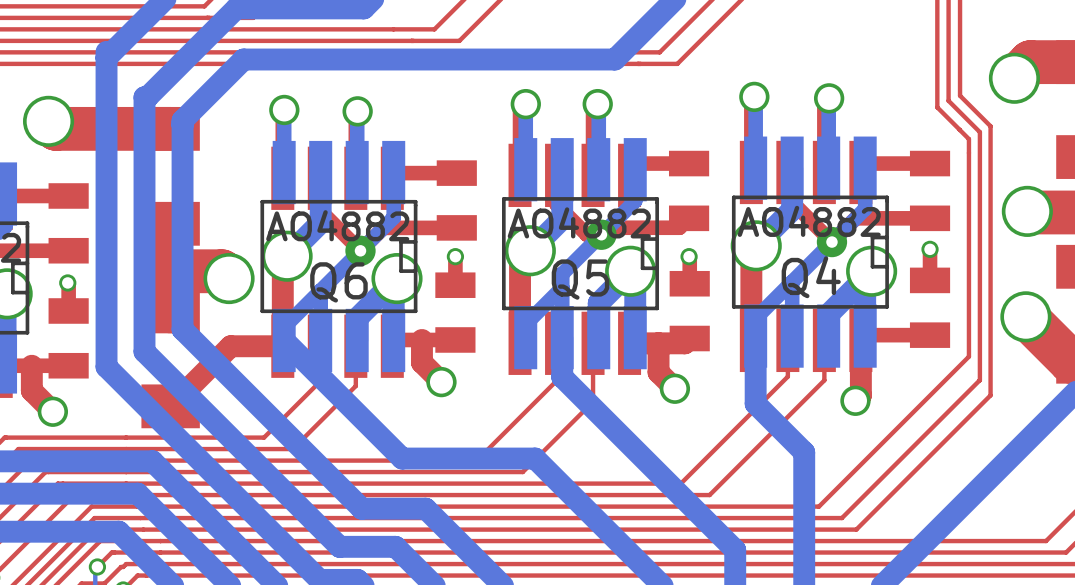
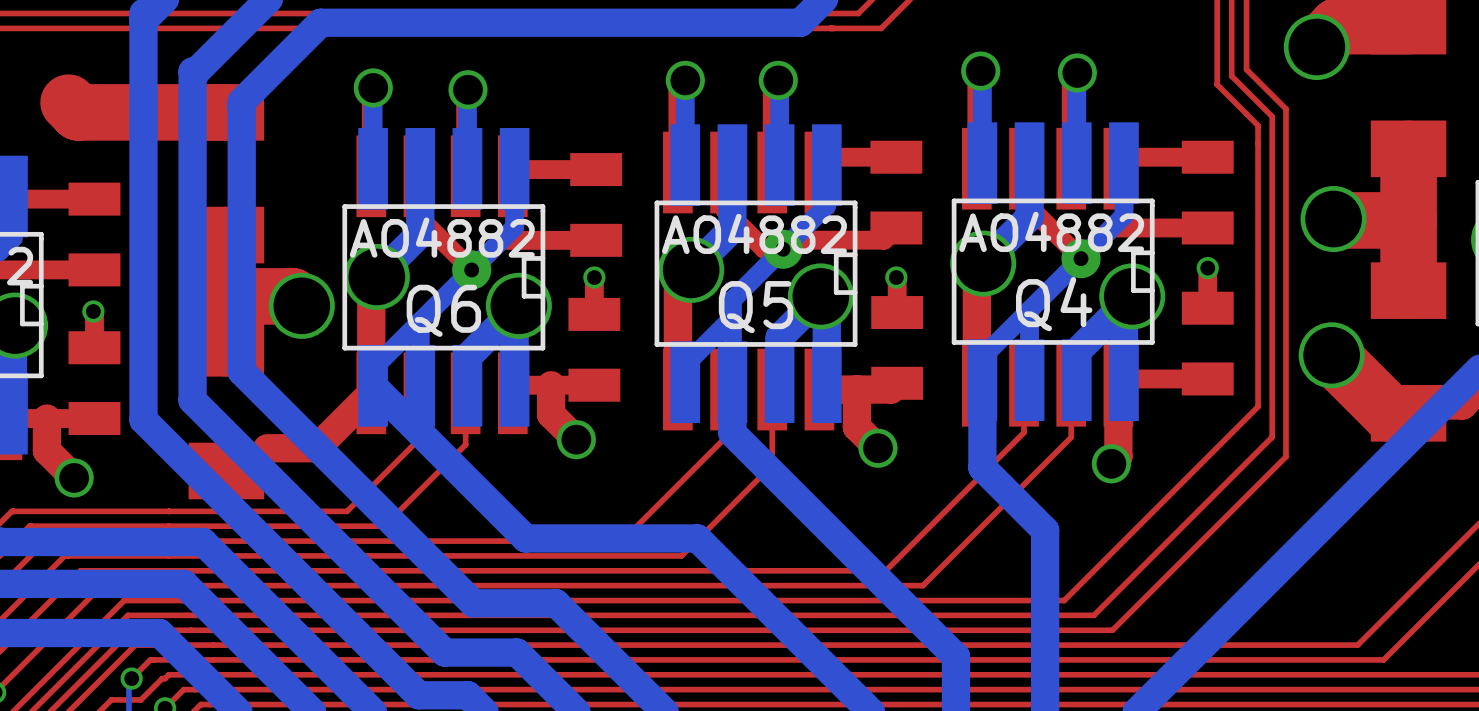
via: (48, 121) -> none
top track: (282, 346) (230, 346) (170, 406) -> (371, 393) (316, 448) (267, 448)

